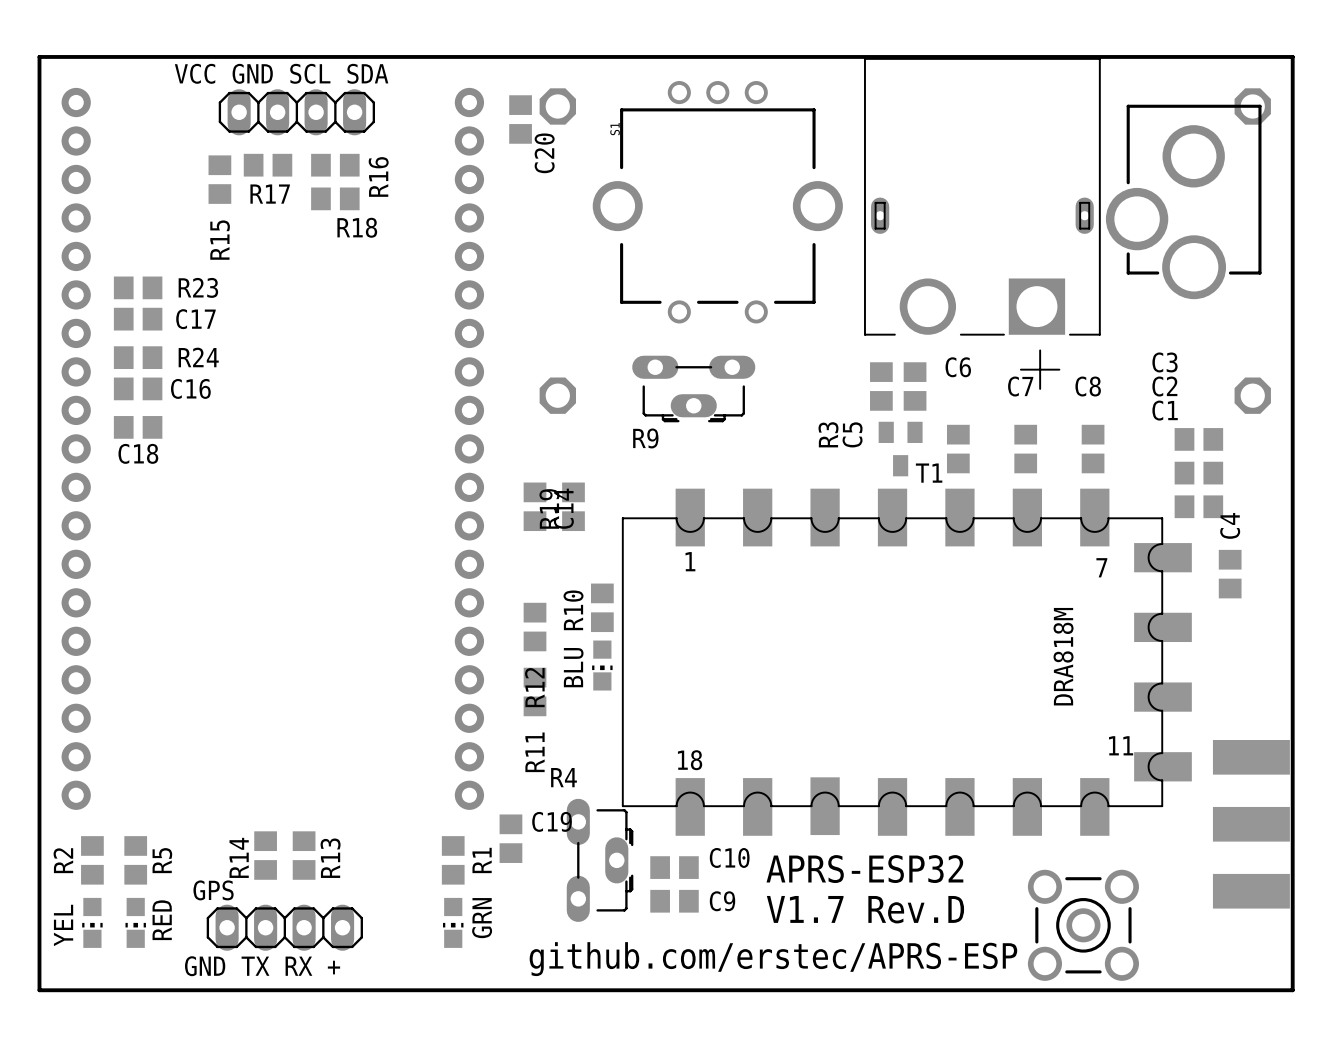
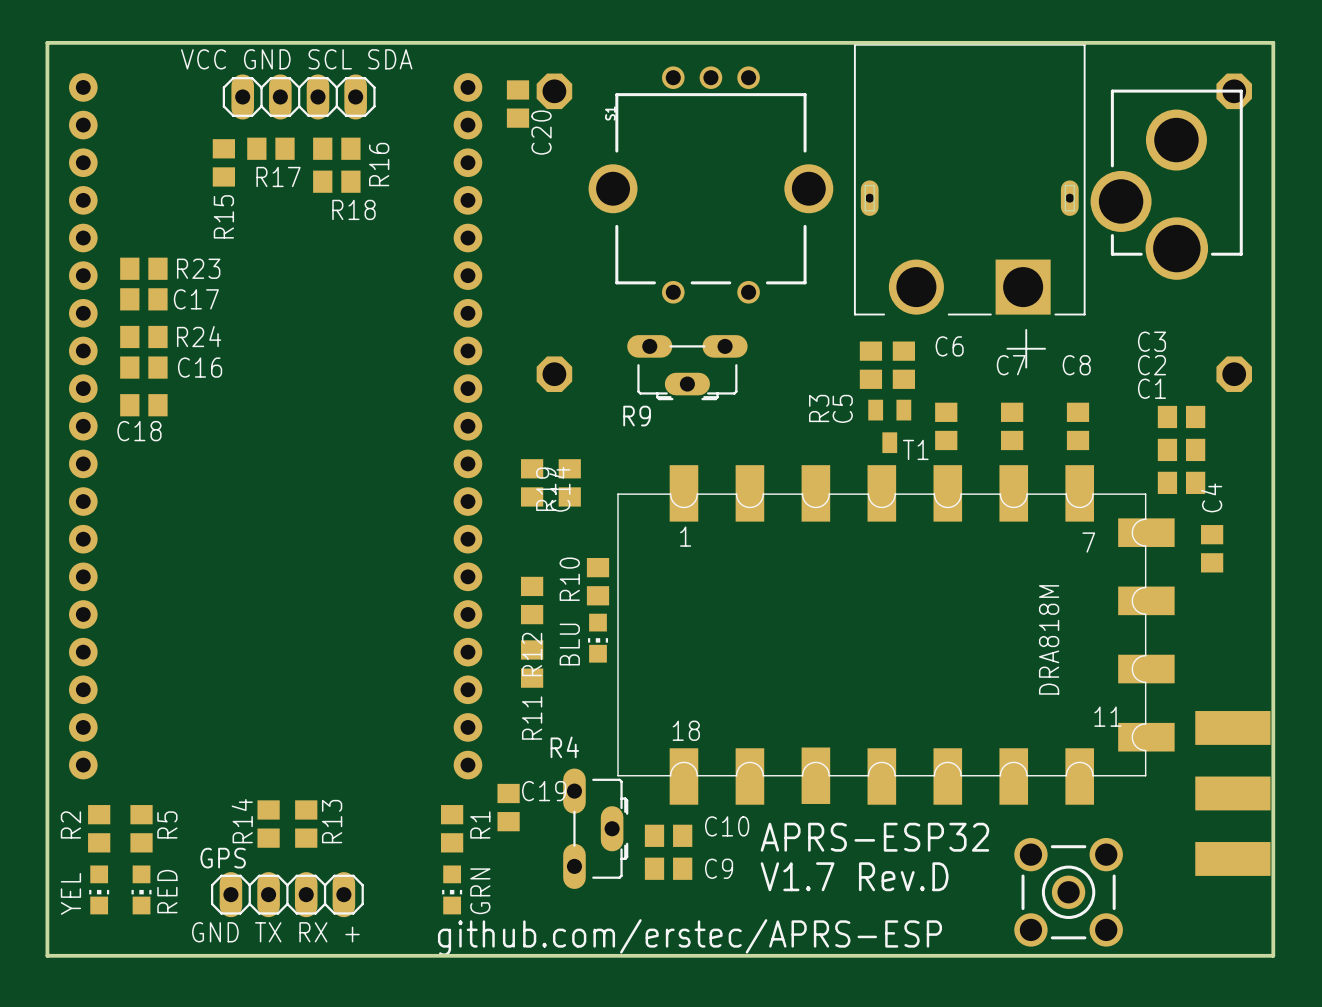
text position: github.com/erstec/APRS-ESP (773, 959) -> github.com/erstec/APRS-ESP (689, 937)

